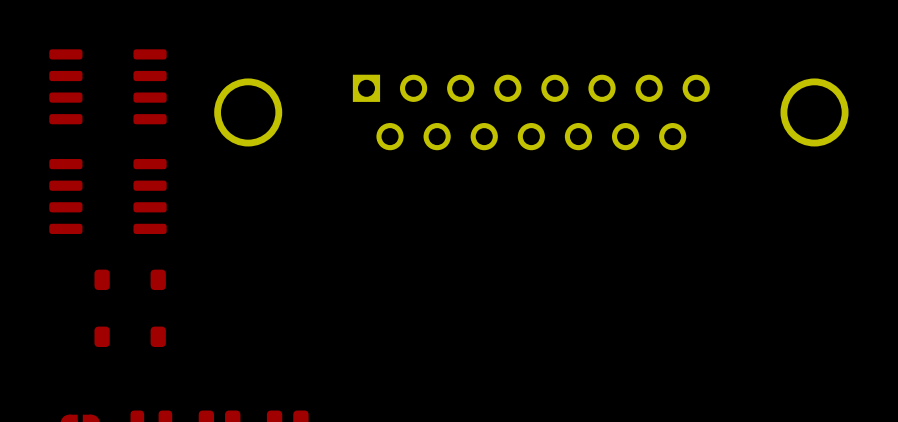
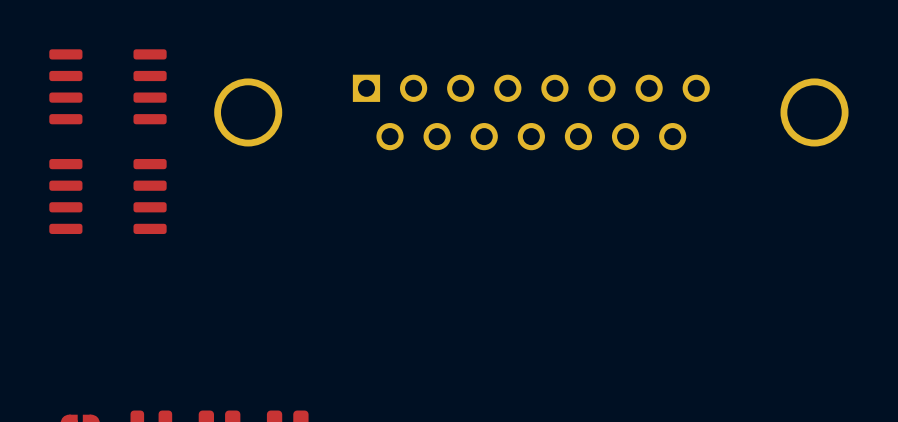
part: (130, 279) -> none
part: (130, 336) -> none

